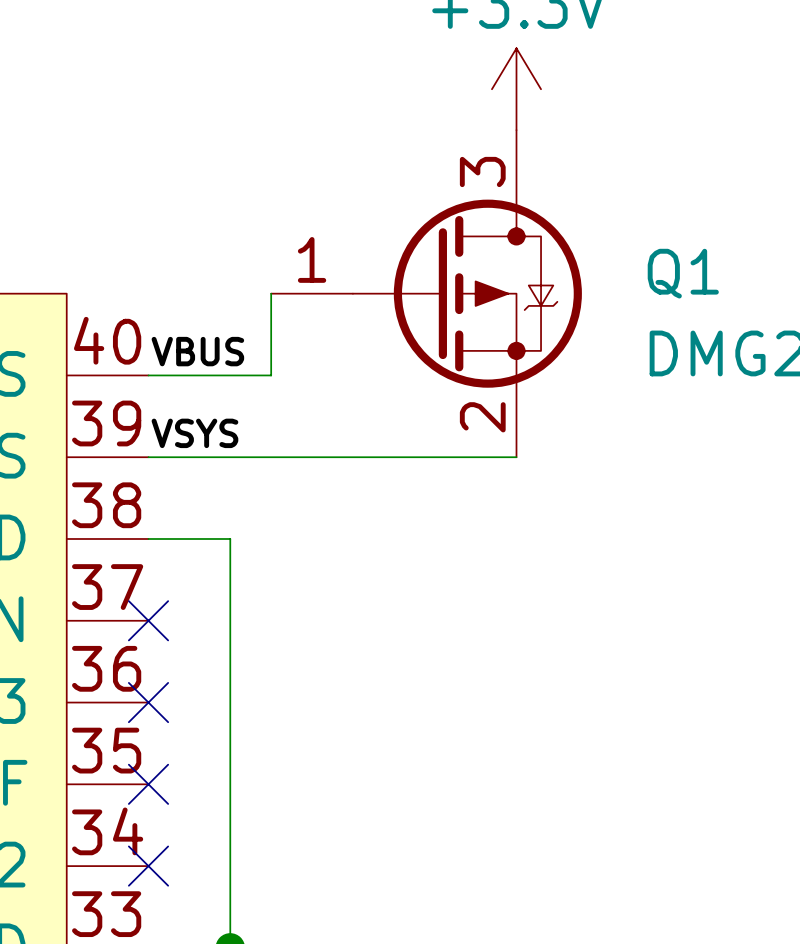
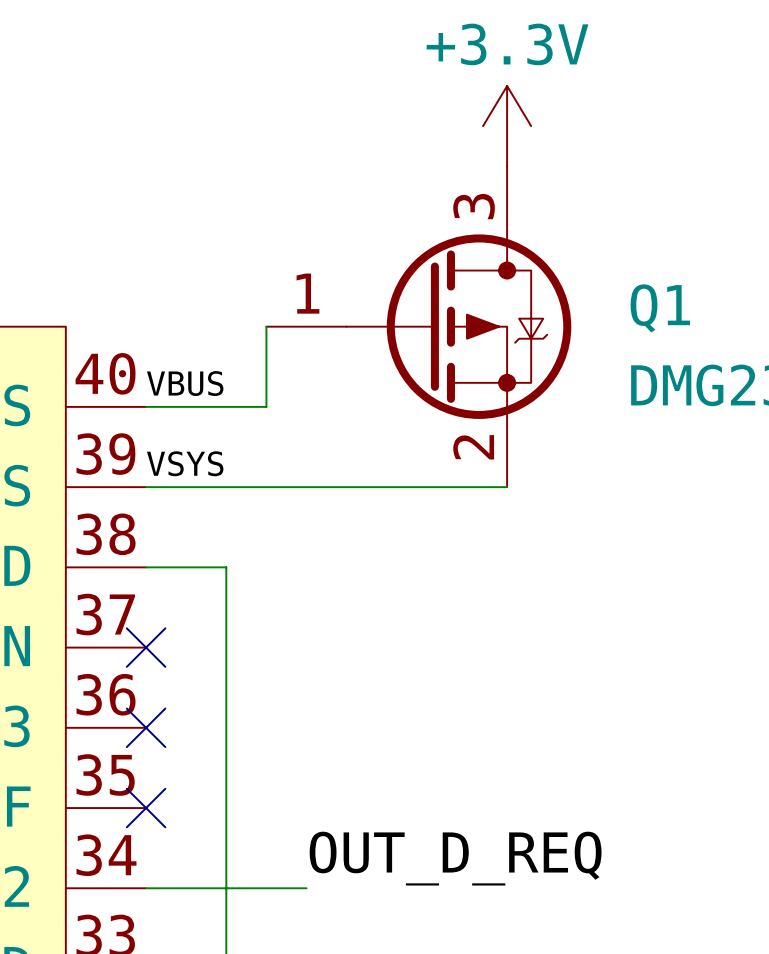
label: none -> OUT_D_REQ (455, 858)
wire: none -> (146, 888) (306, 888)
no-connect mark: (148, 866) -> none

